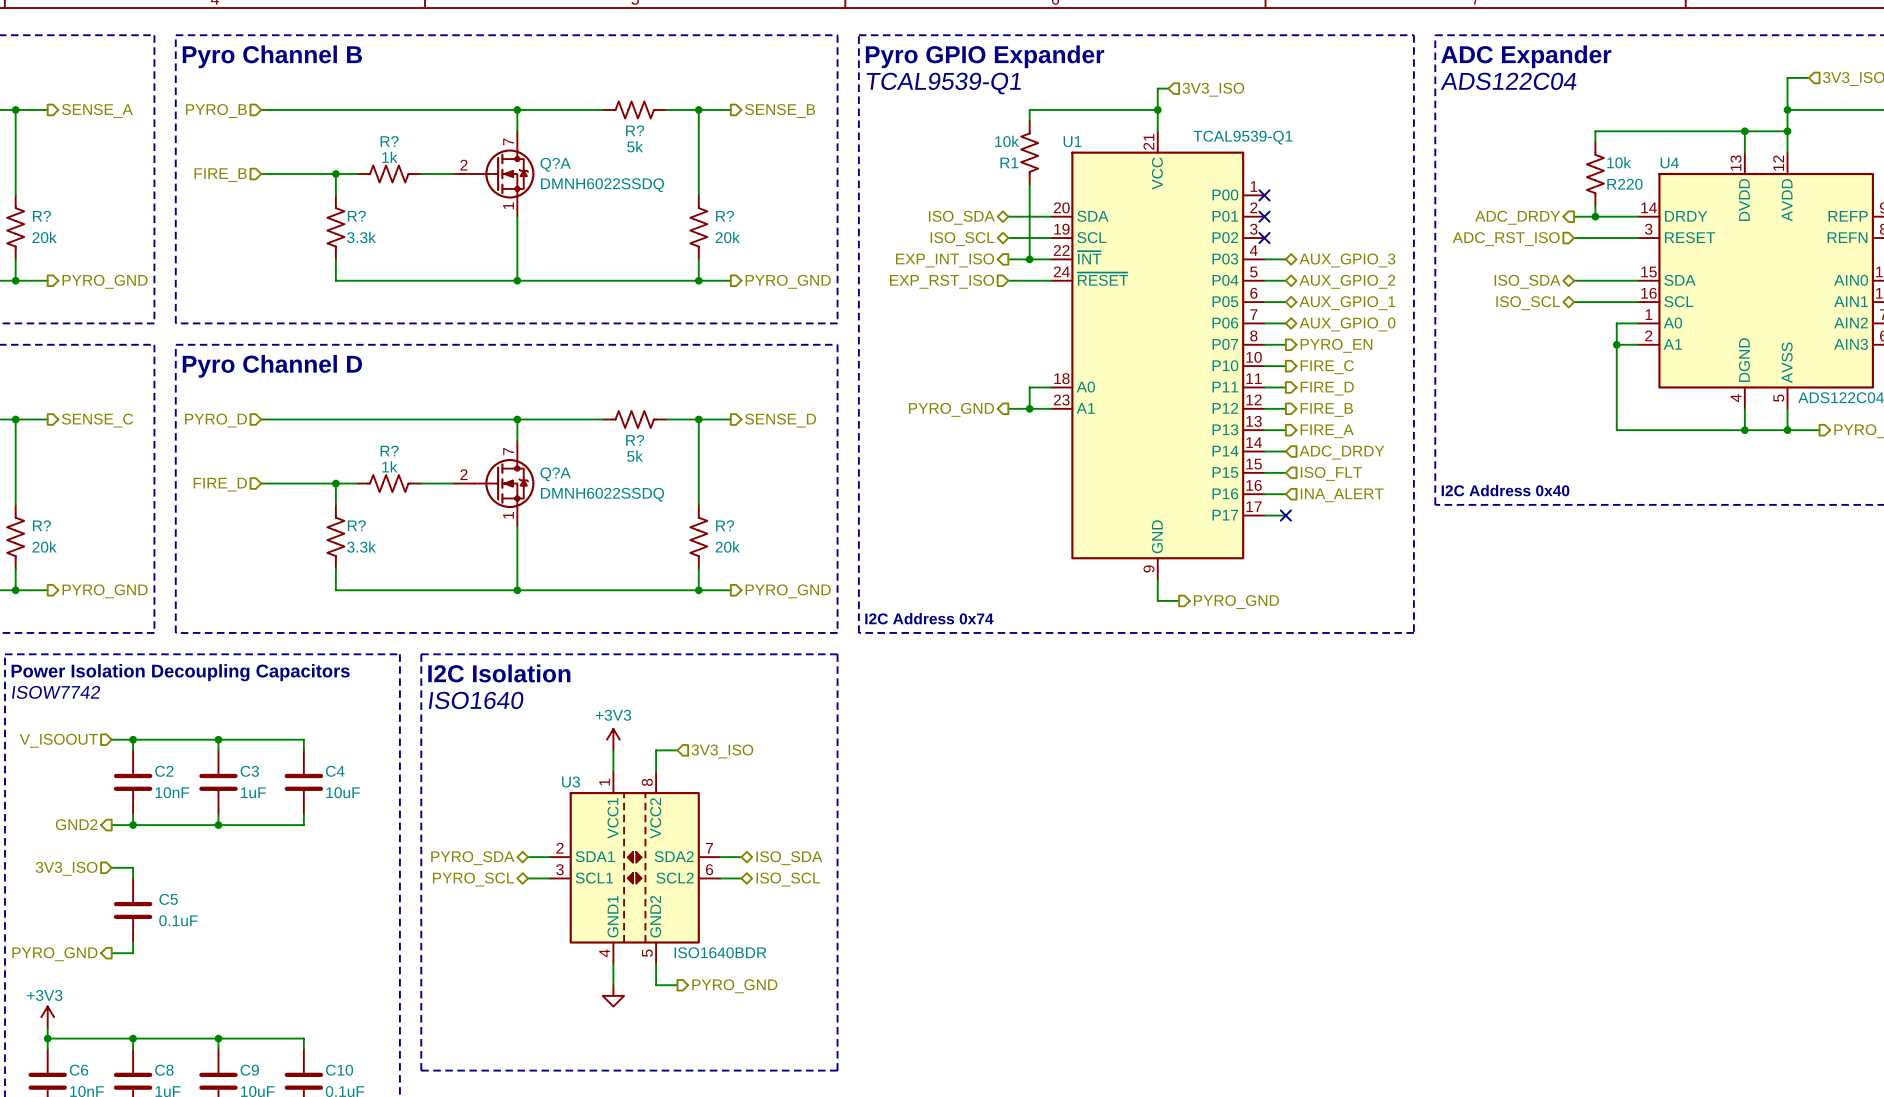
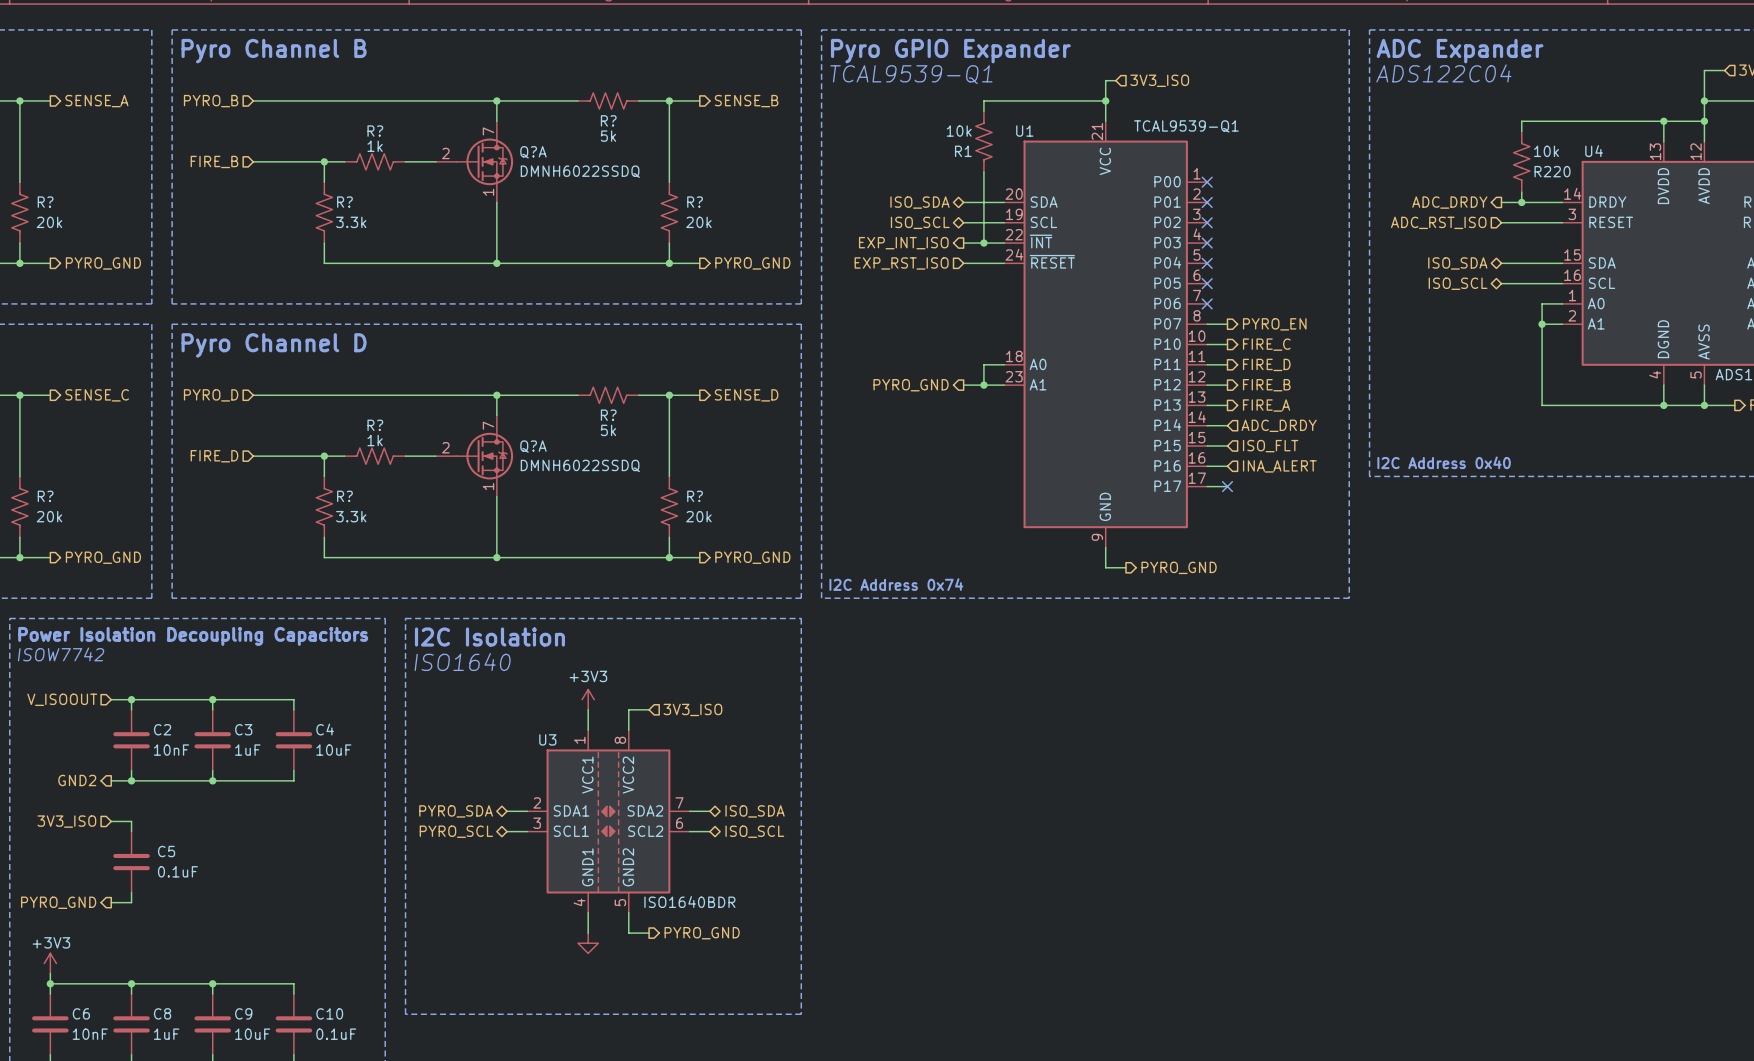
wire: (1264, 259) (1285, 259) -> none
no-connect mark: none -> (1207, 243)
hierarchical label: AUX_GPIO_3 (1347, 260) -> none
wire: (1264, 280) (1285, 280) -> none
no-connect mark: none -> (1207, 263)
hierarchical label: AUX_GPIO_2 (1347, 281) -> none
wire: (1264, 302) (1285, 302) -> none
no-connect mark: none -> (1207, 283)
hierarchical label: AUX_GPIO_1 (1347, 303) -> none
wire: (1264, 323) (1285, 323) -> none
no-connect mark: none -> (1207, 303)
hierarchical label: AUX_GPIO_0 (1347, 324) -> none

